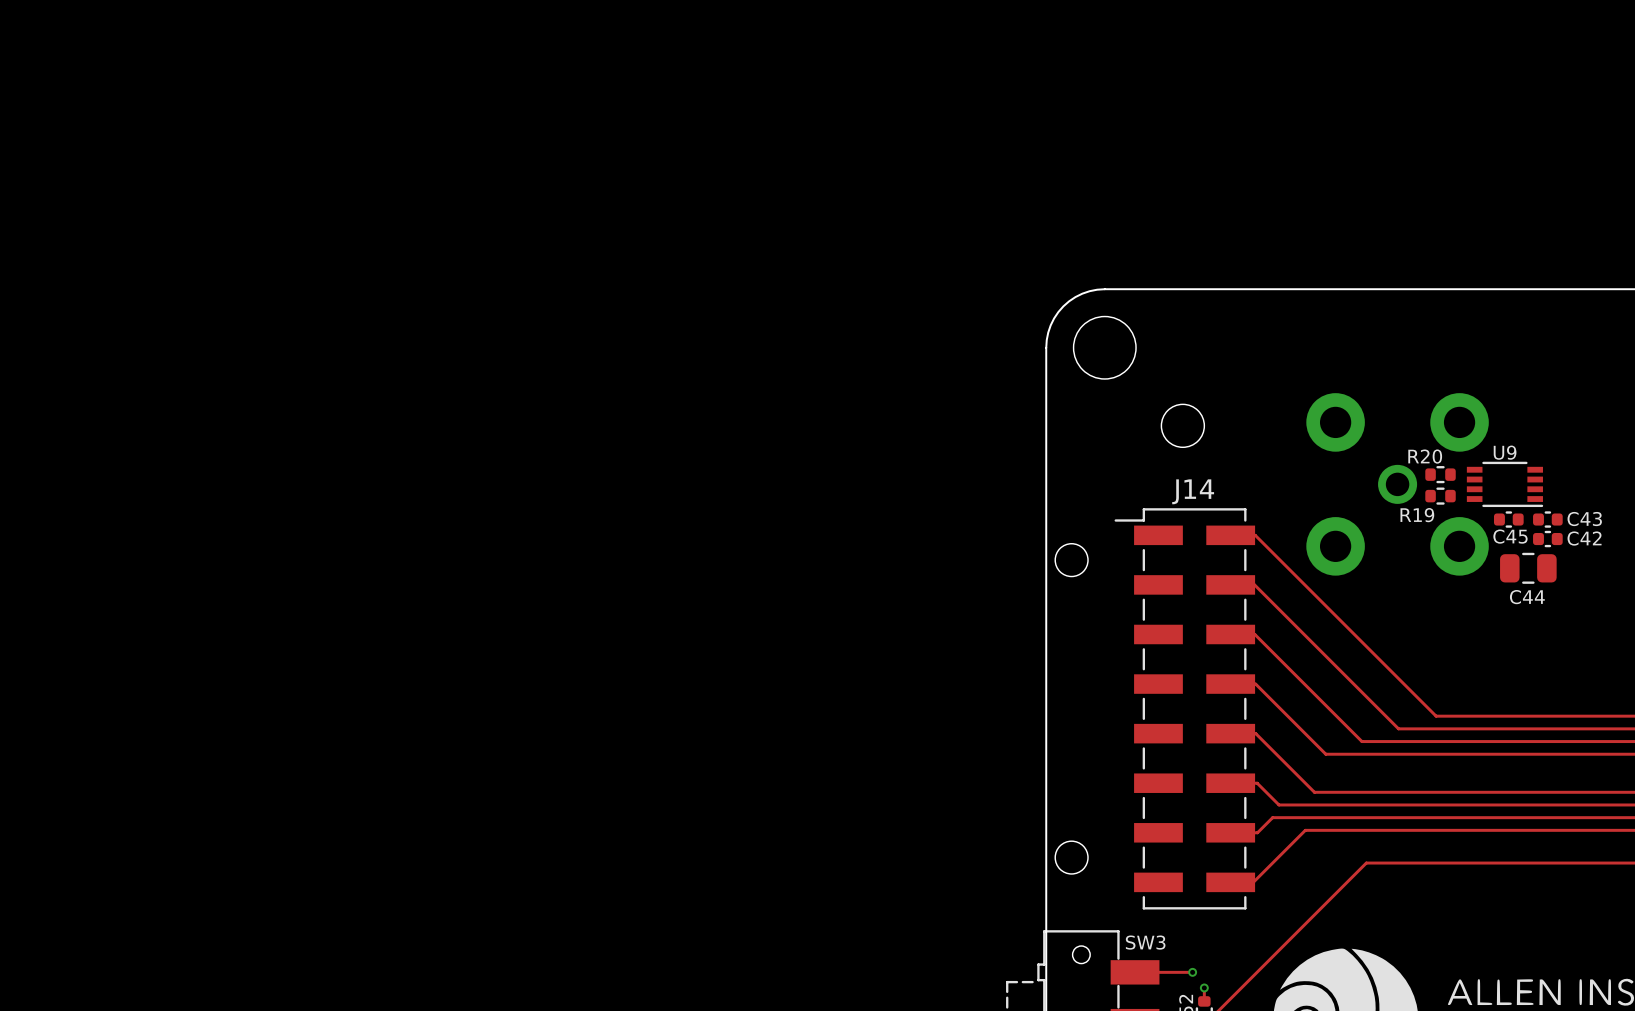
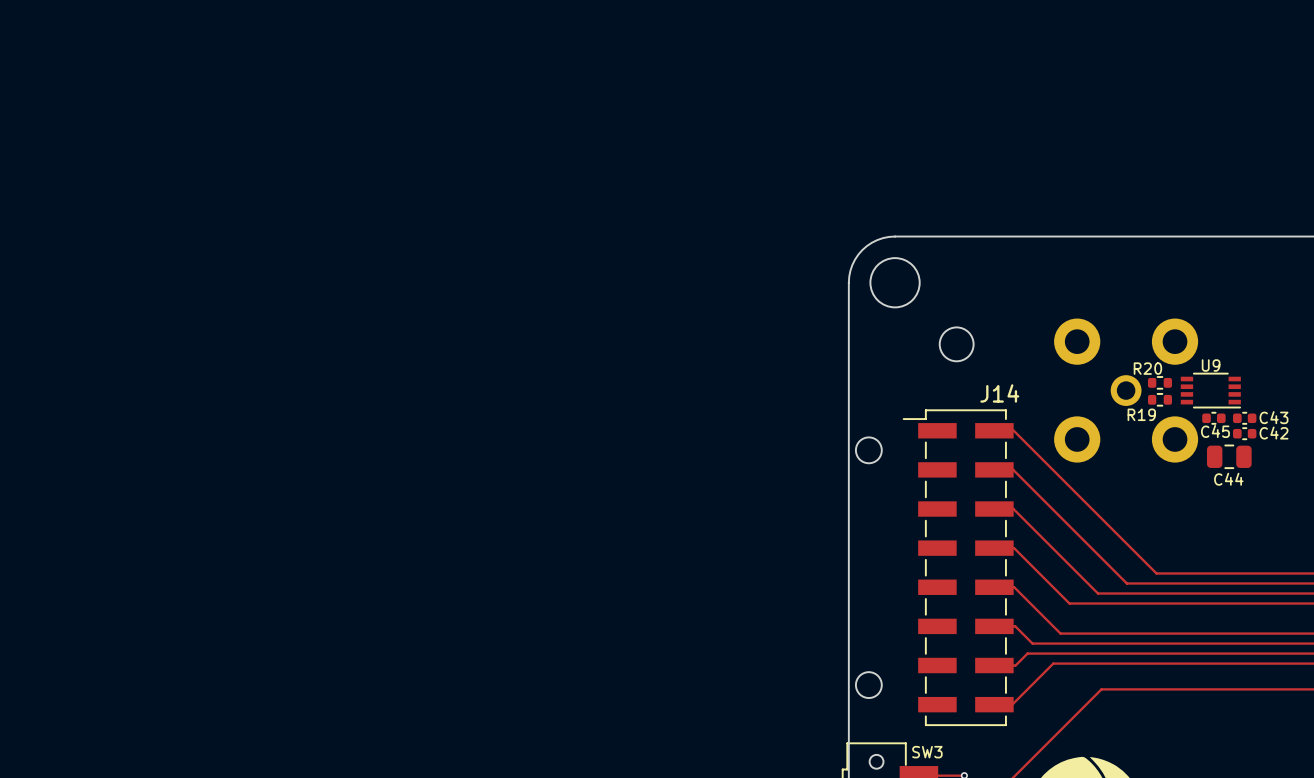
J14 name position: J14 (1193, 491) -> J14 (999, 393)

